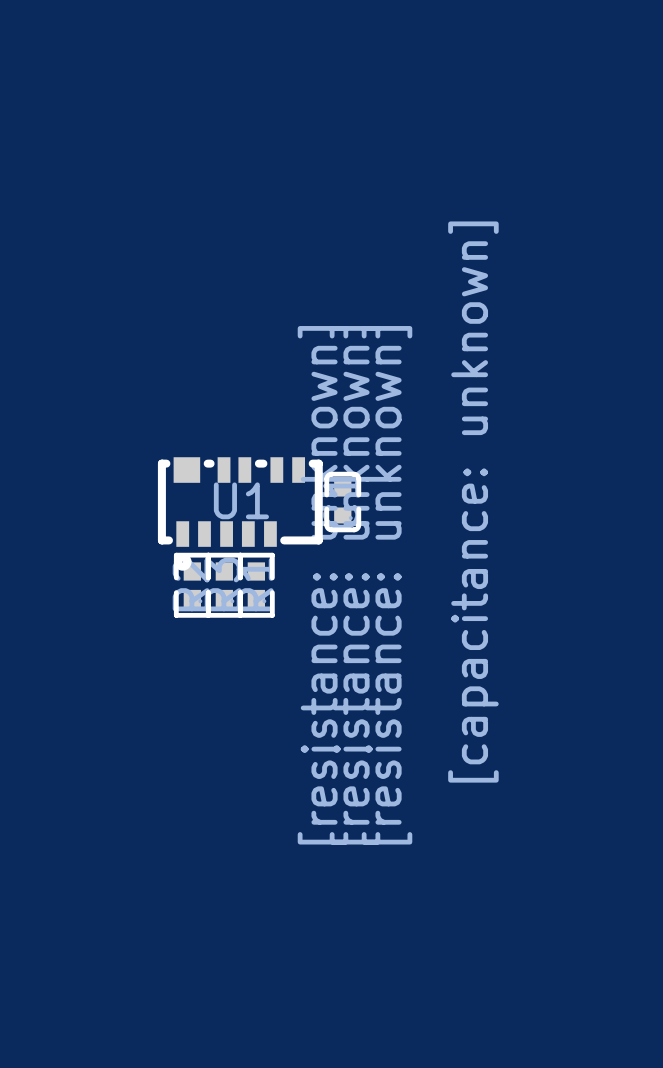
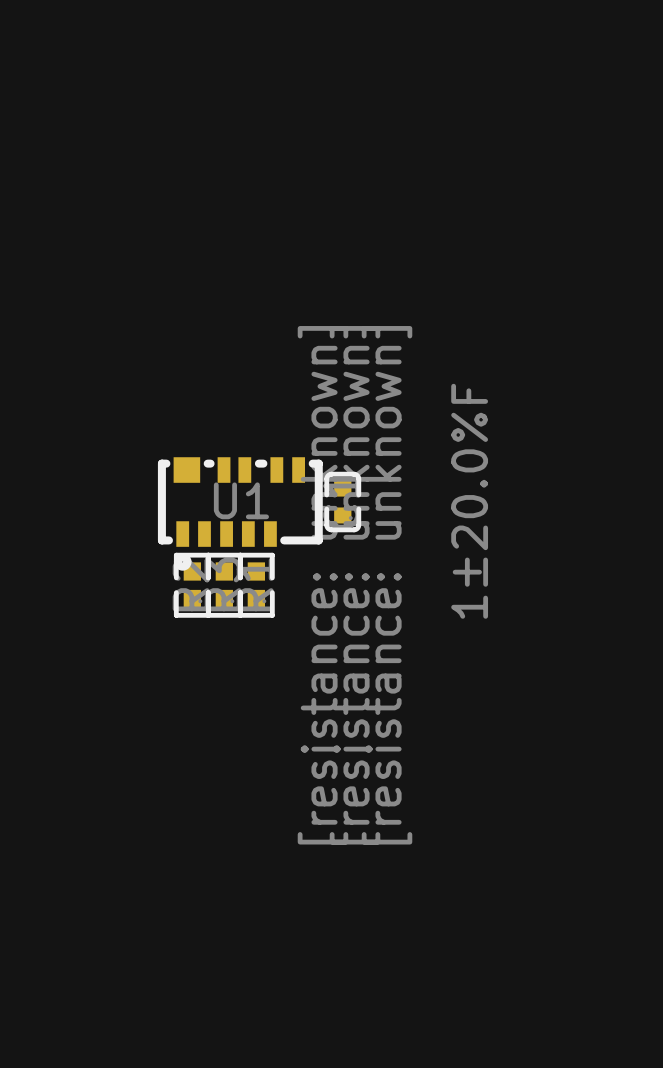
part value: [capacitance: unknown] (473, 502) -> 1±20.0%F (469, 501)

